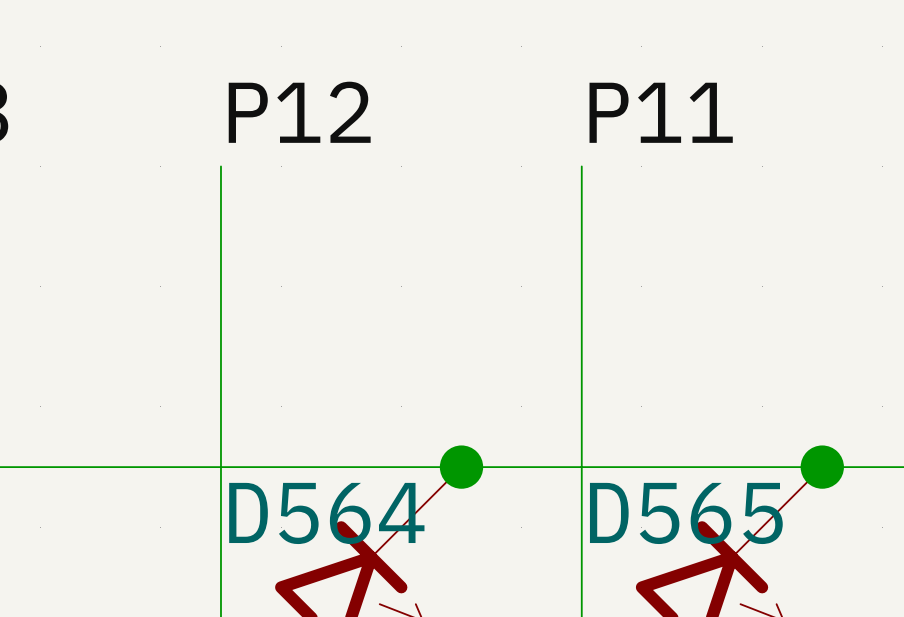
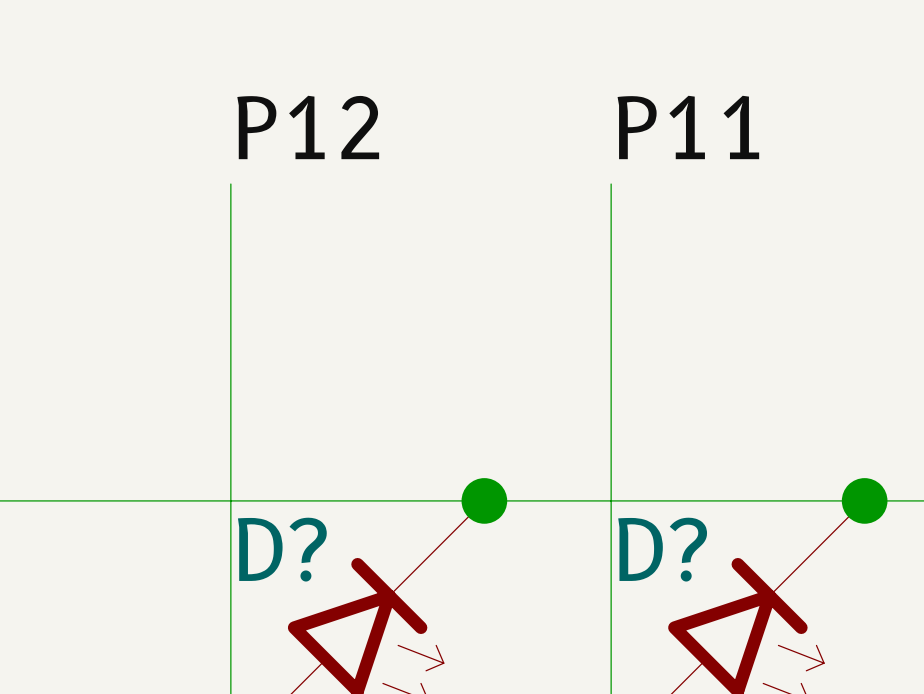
D564 name: D564 (326, 513) -> D? (282, 549)
D565 name: D565 (686, 513) -> D? (662, 549)

